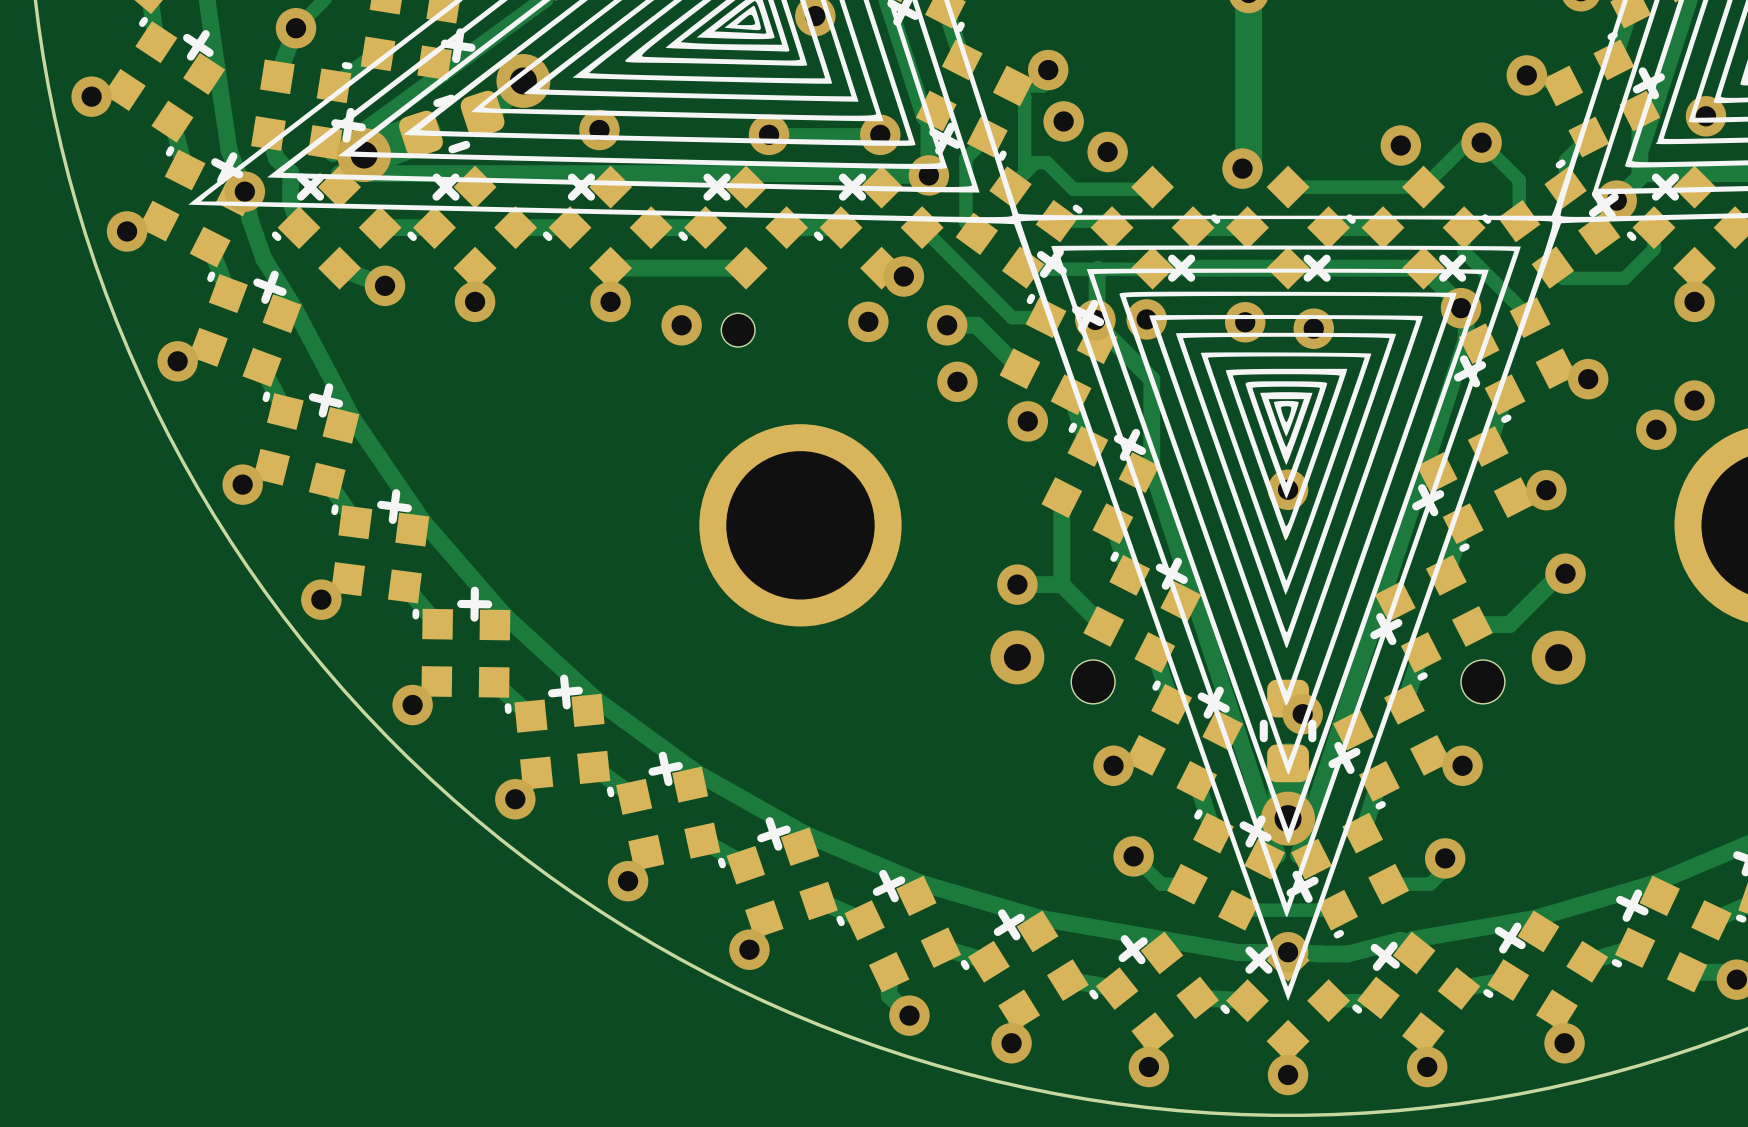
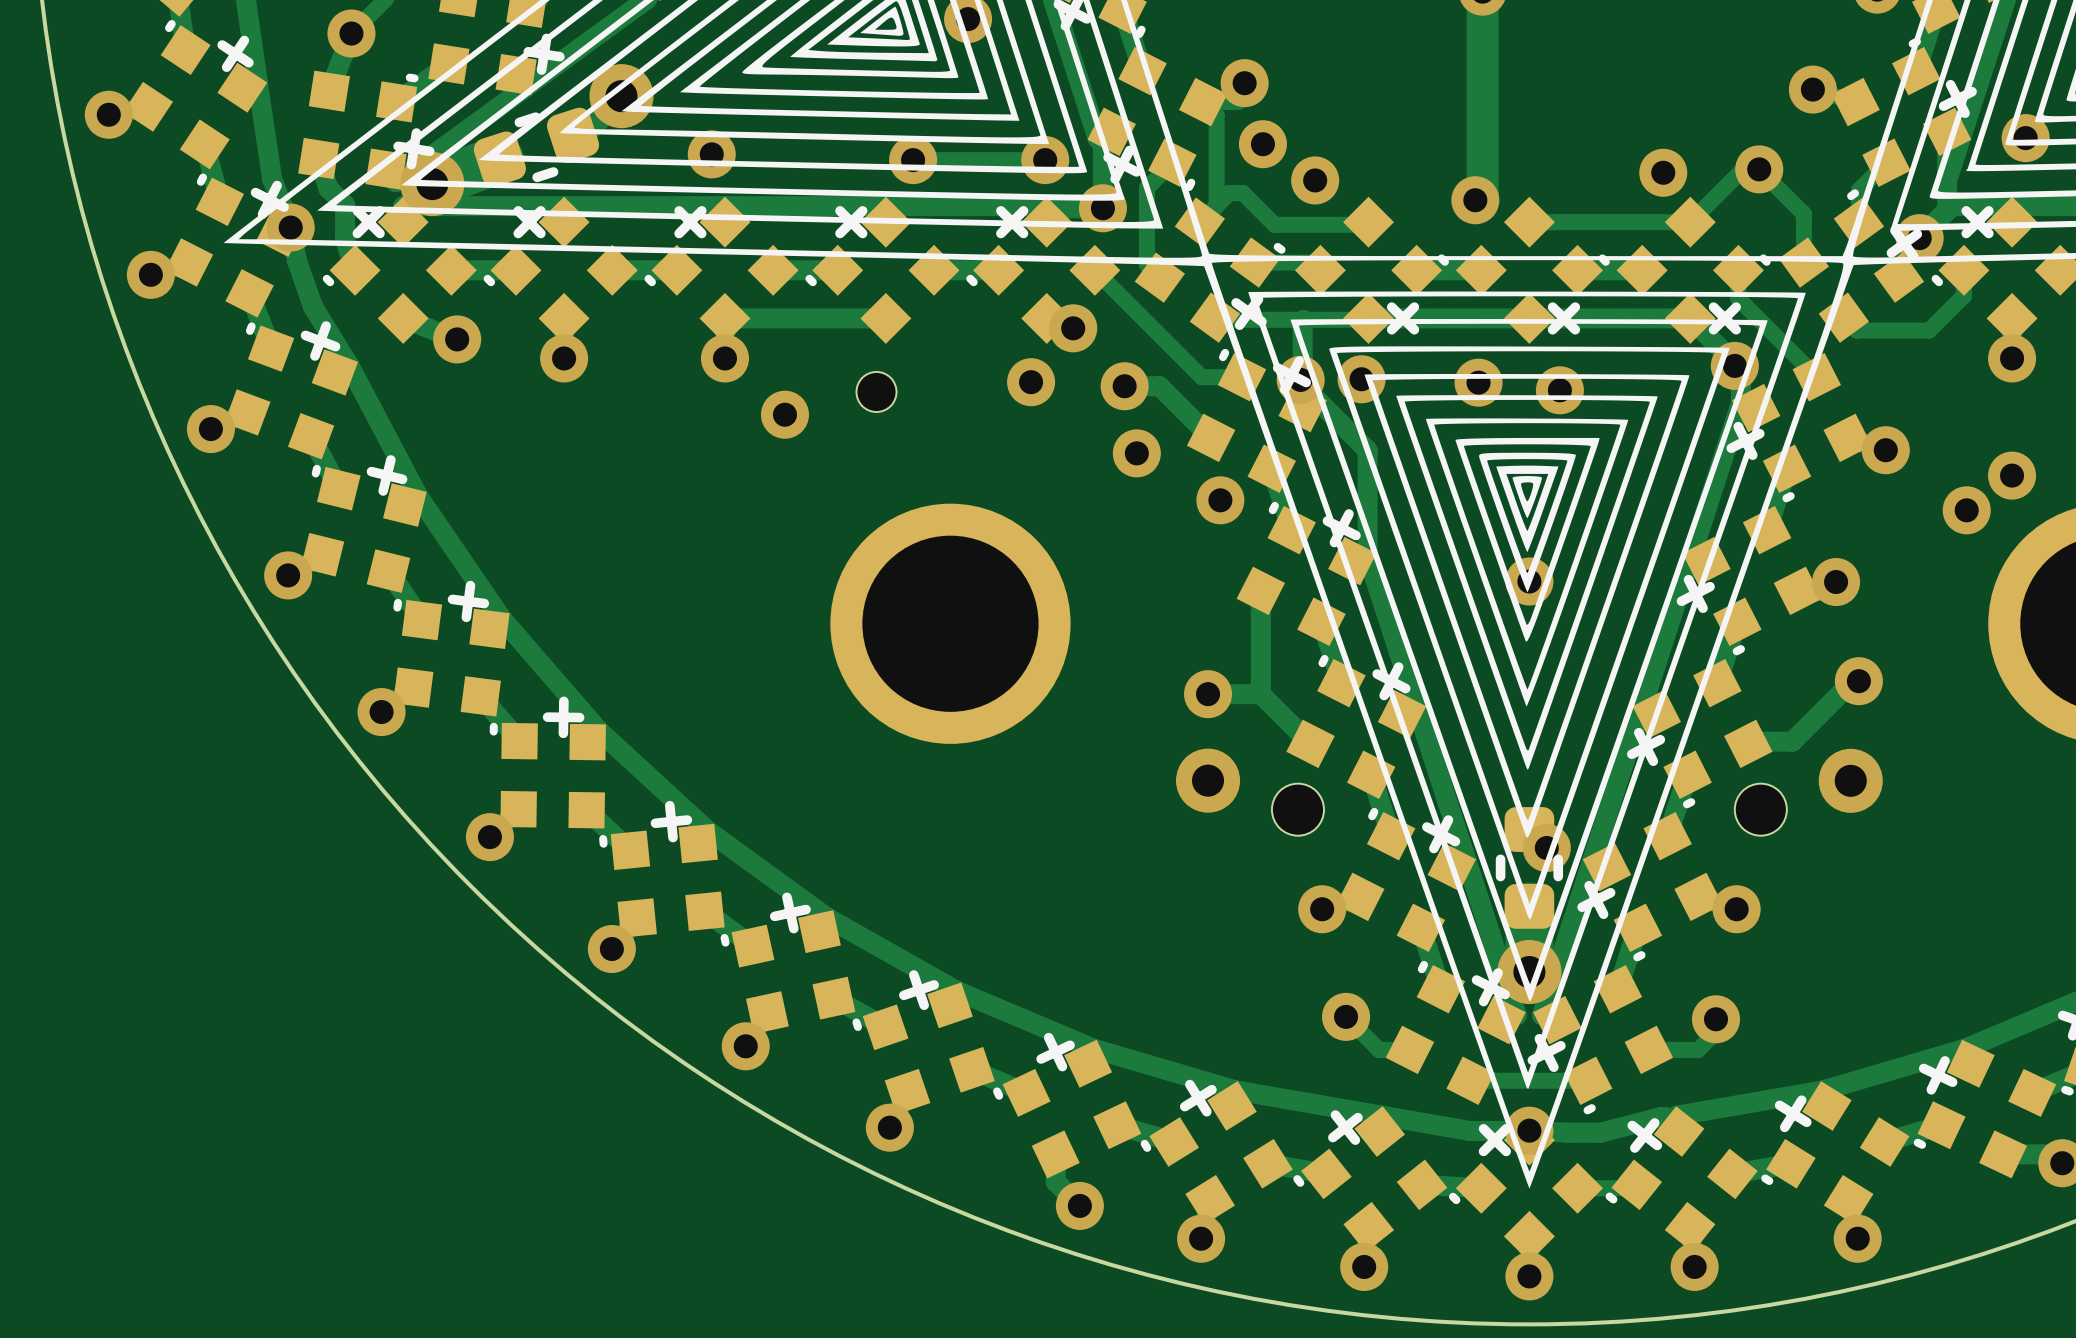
via position: (681, 325) -> (784, 414)

